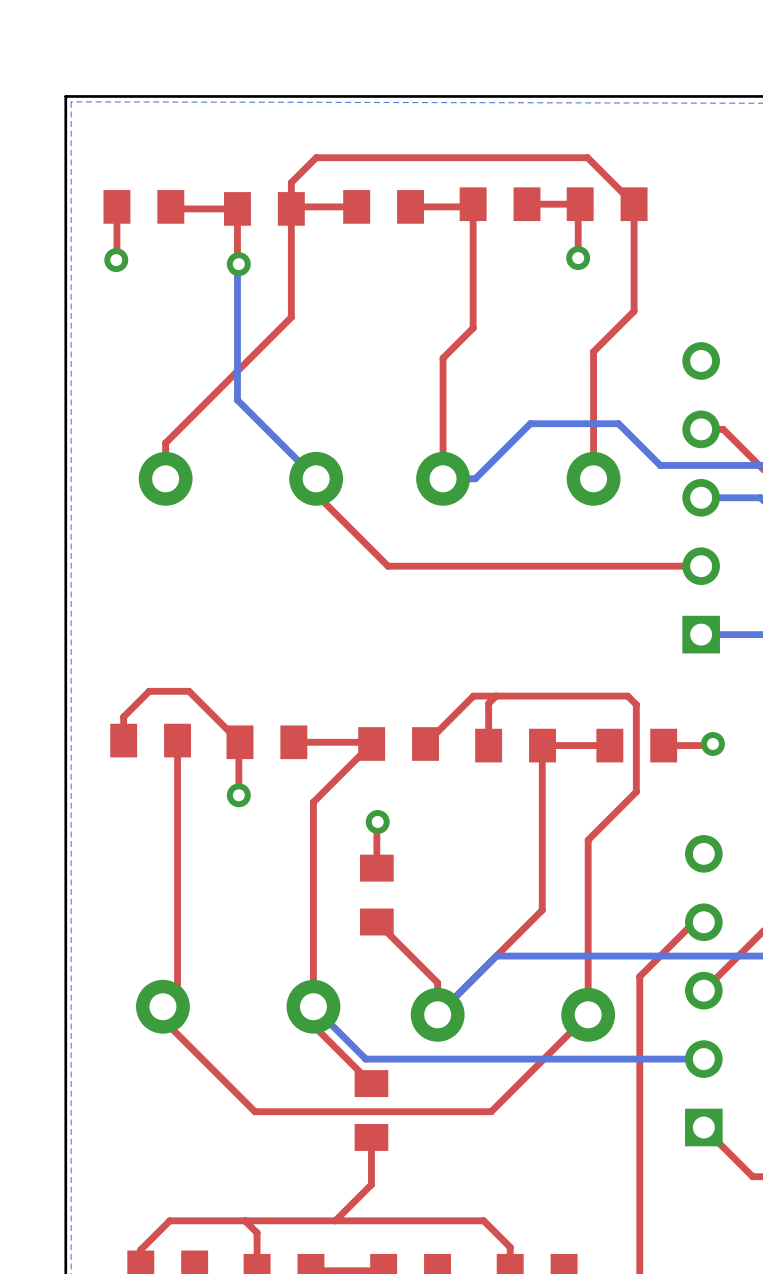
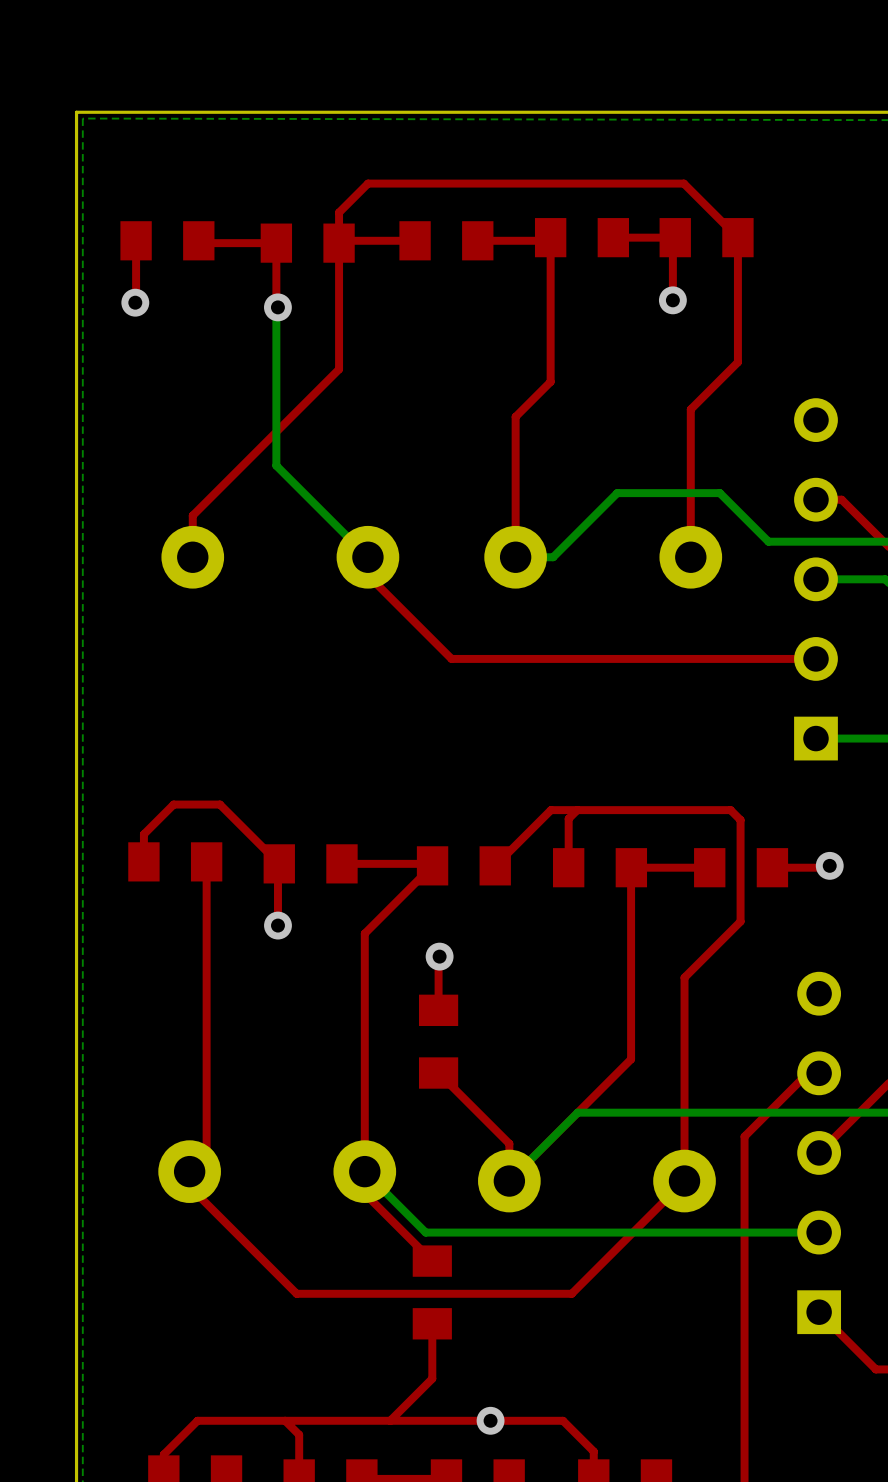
via: none -> (490, 1420)

